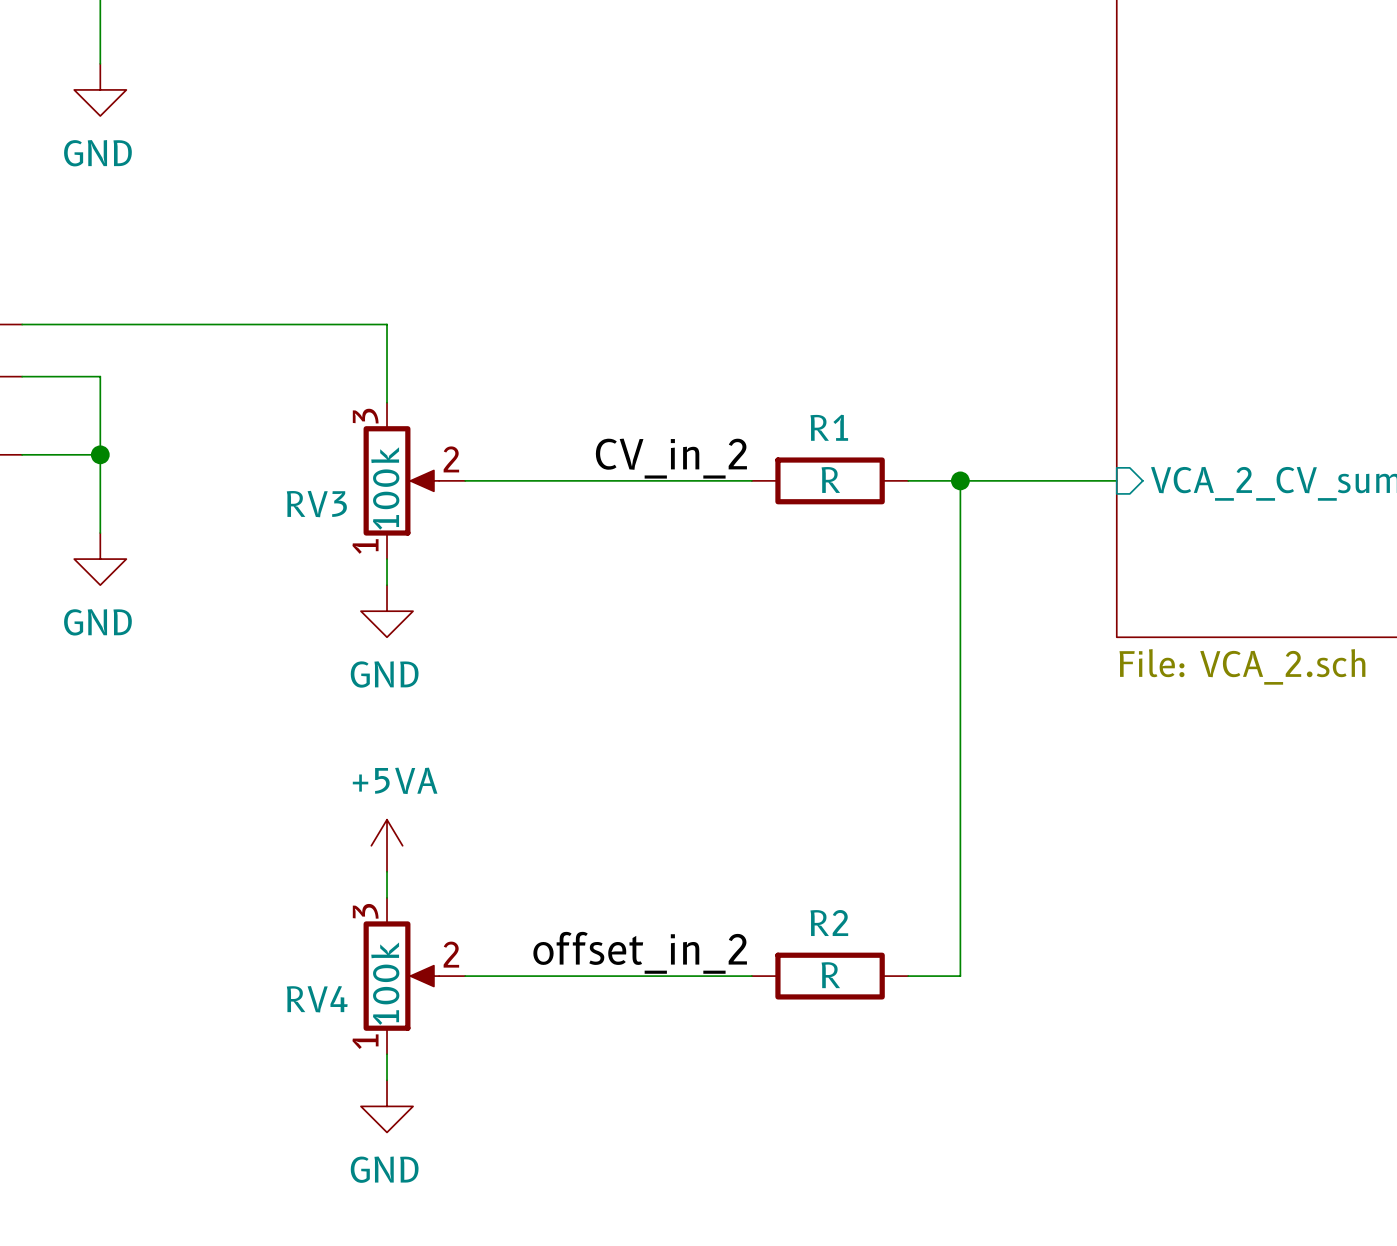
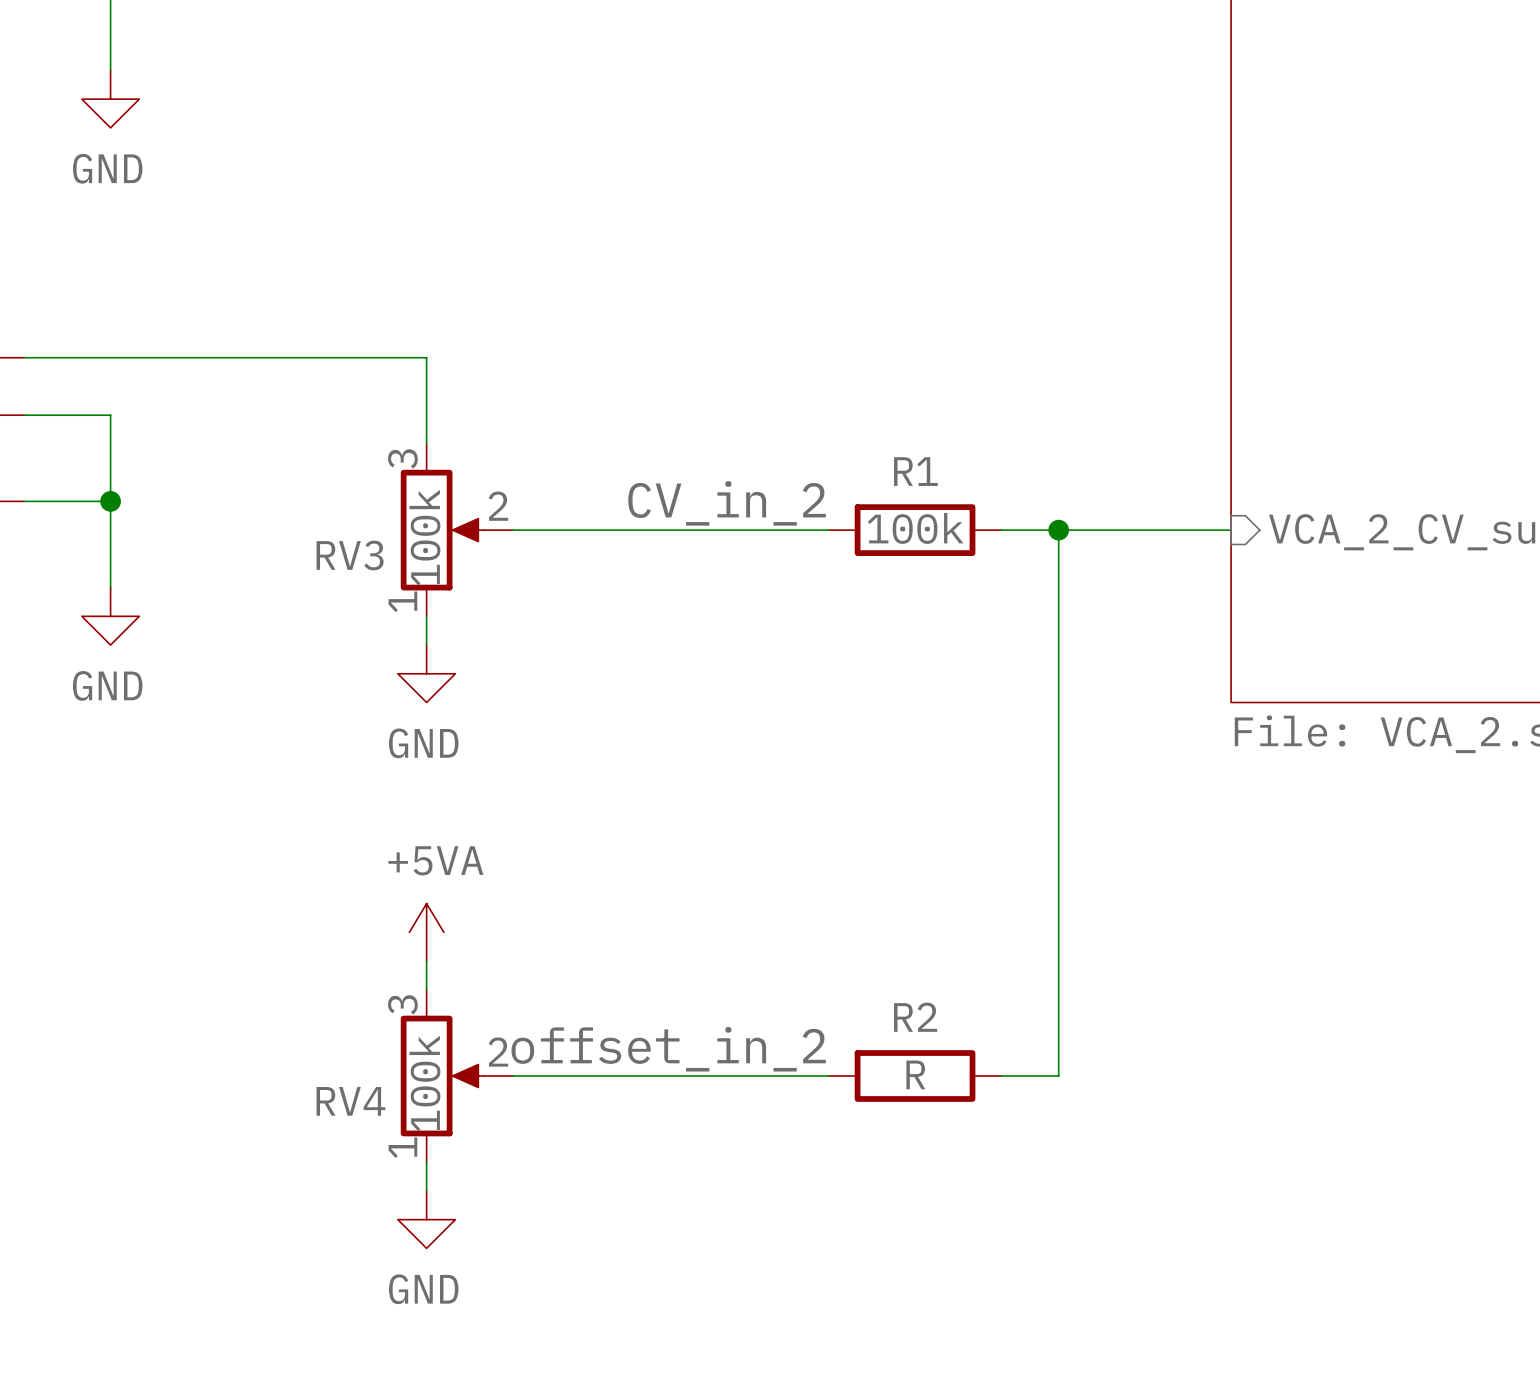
R1 value: R (830, 479) -> 100k (915, 528)

